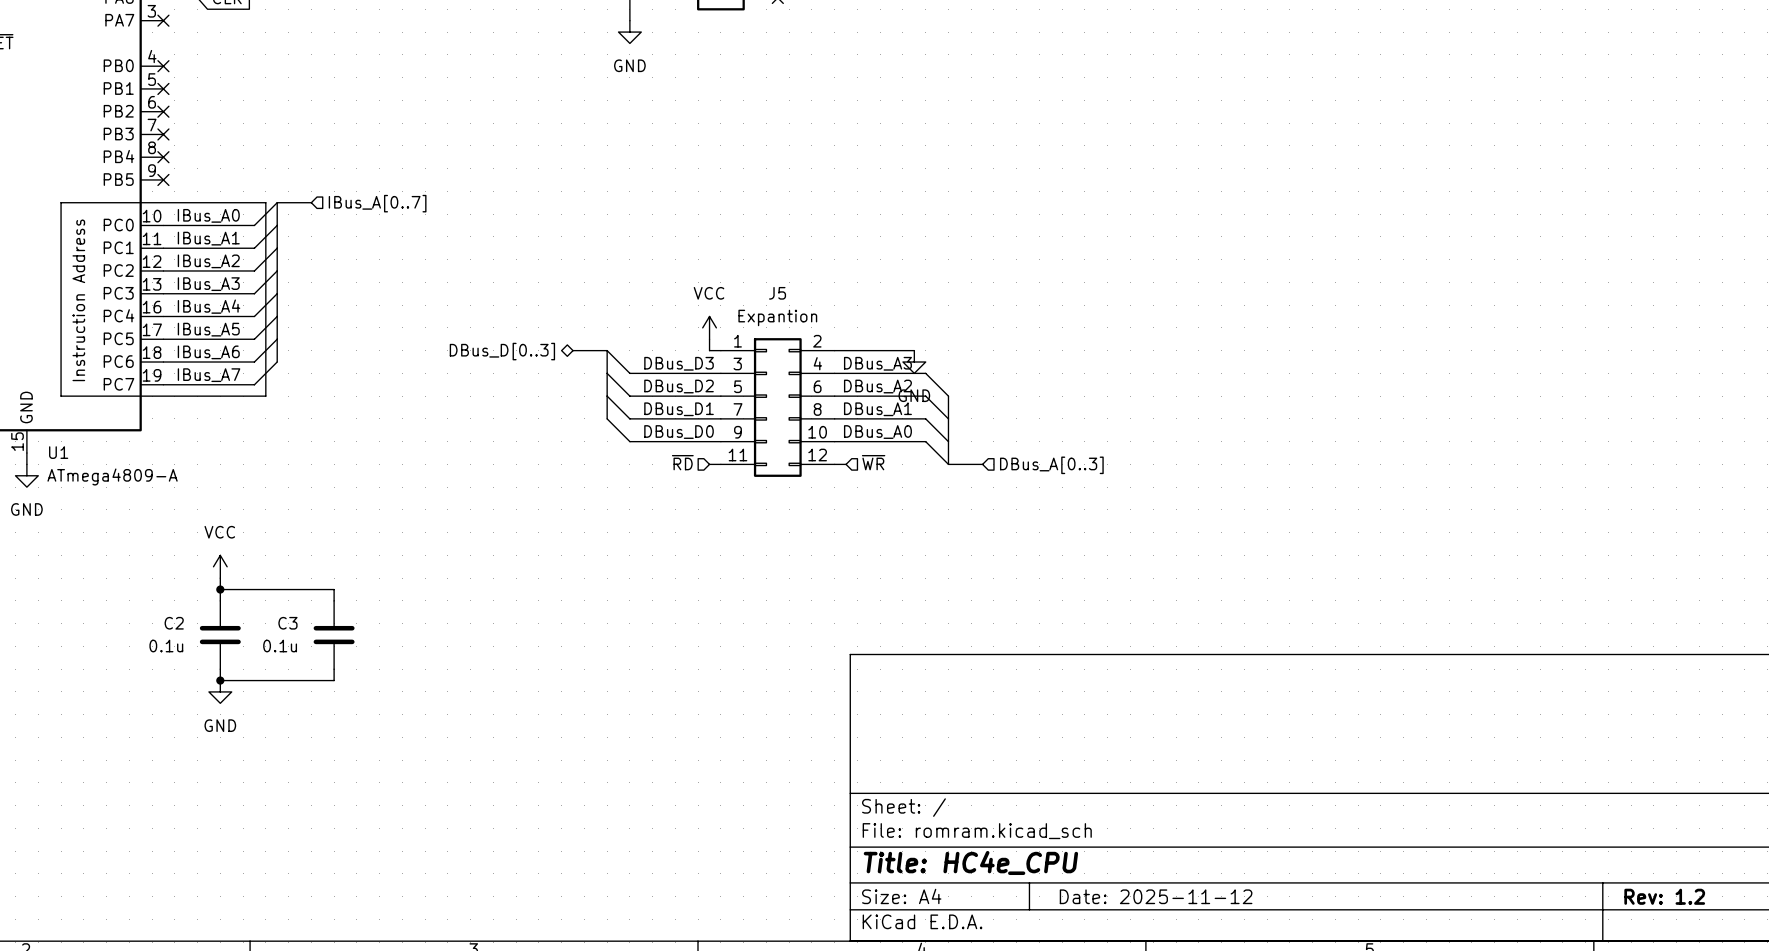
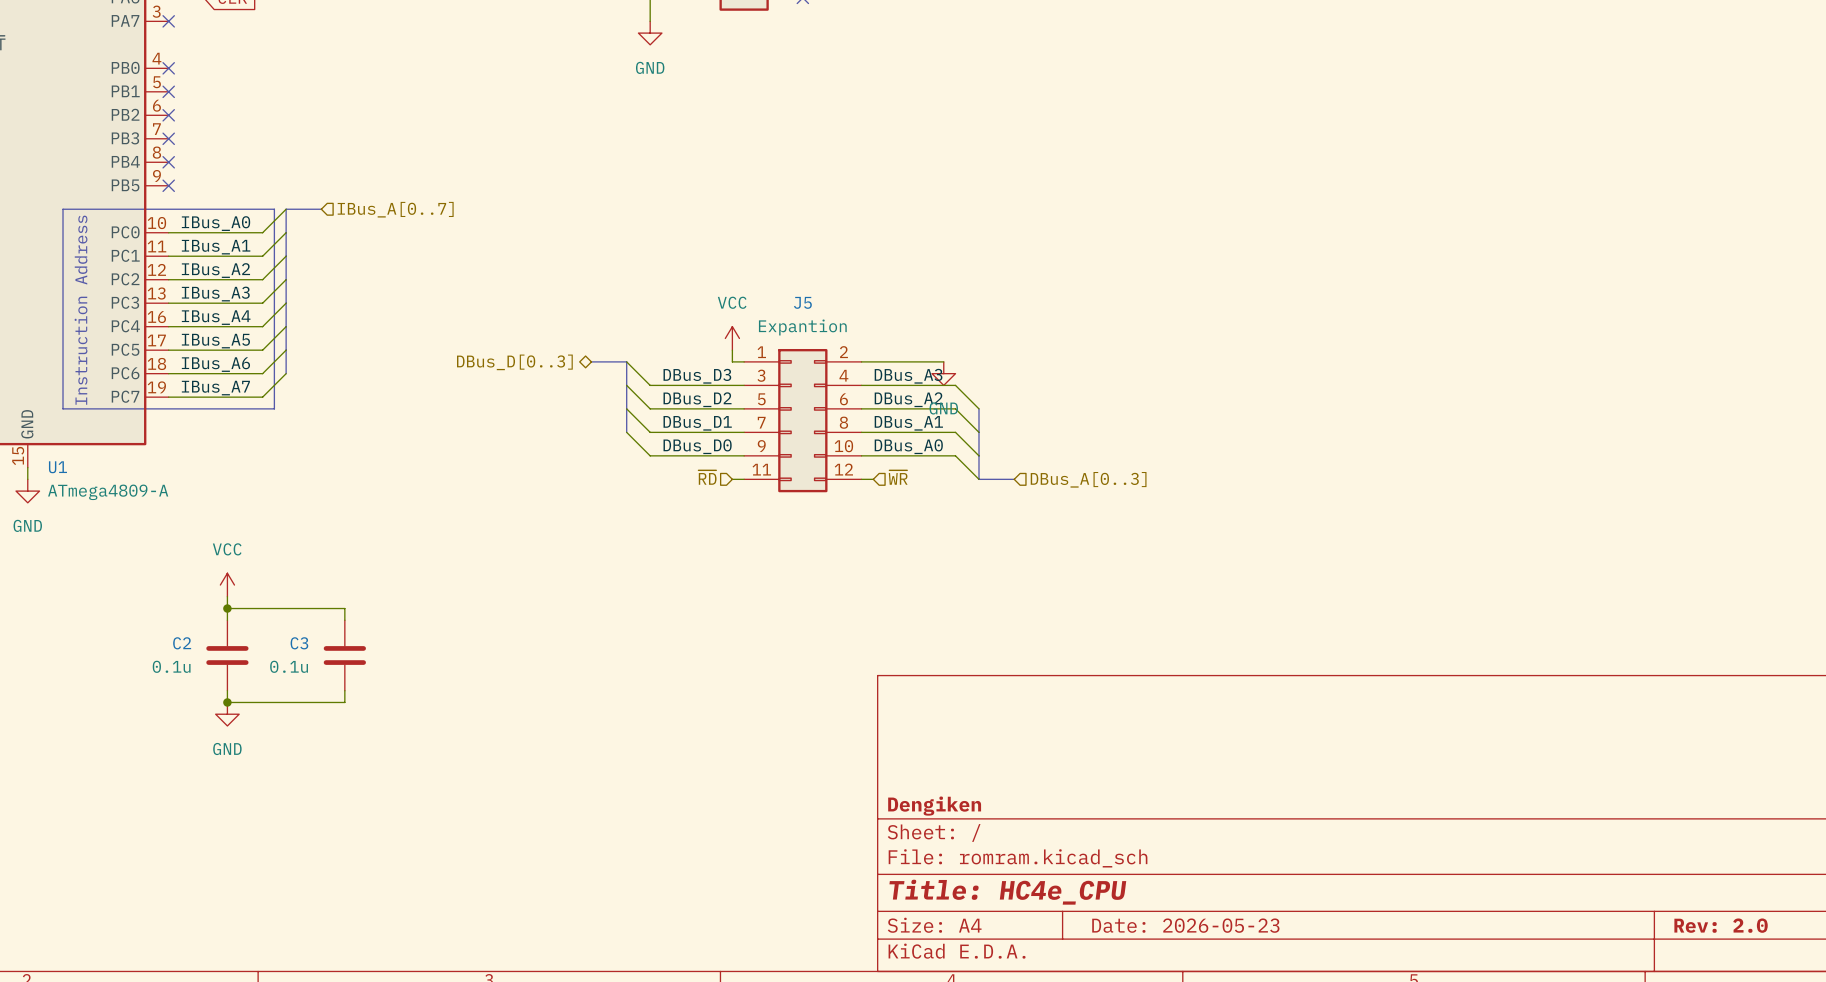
title block: none -> Dengiken (934, 806)
title block: Date: 2025-11-12 (1156, 896) -> Date: 2026-05-23 (1185, 925)
title block: Rev: 1.2 (1664, 896) -> Rev: 2.0 (1721, 925)

